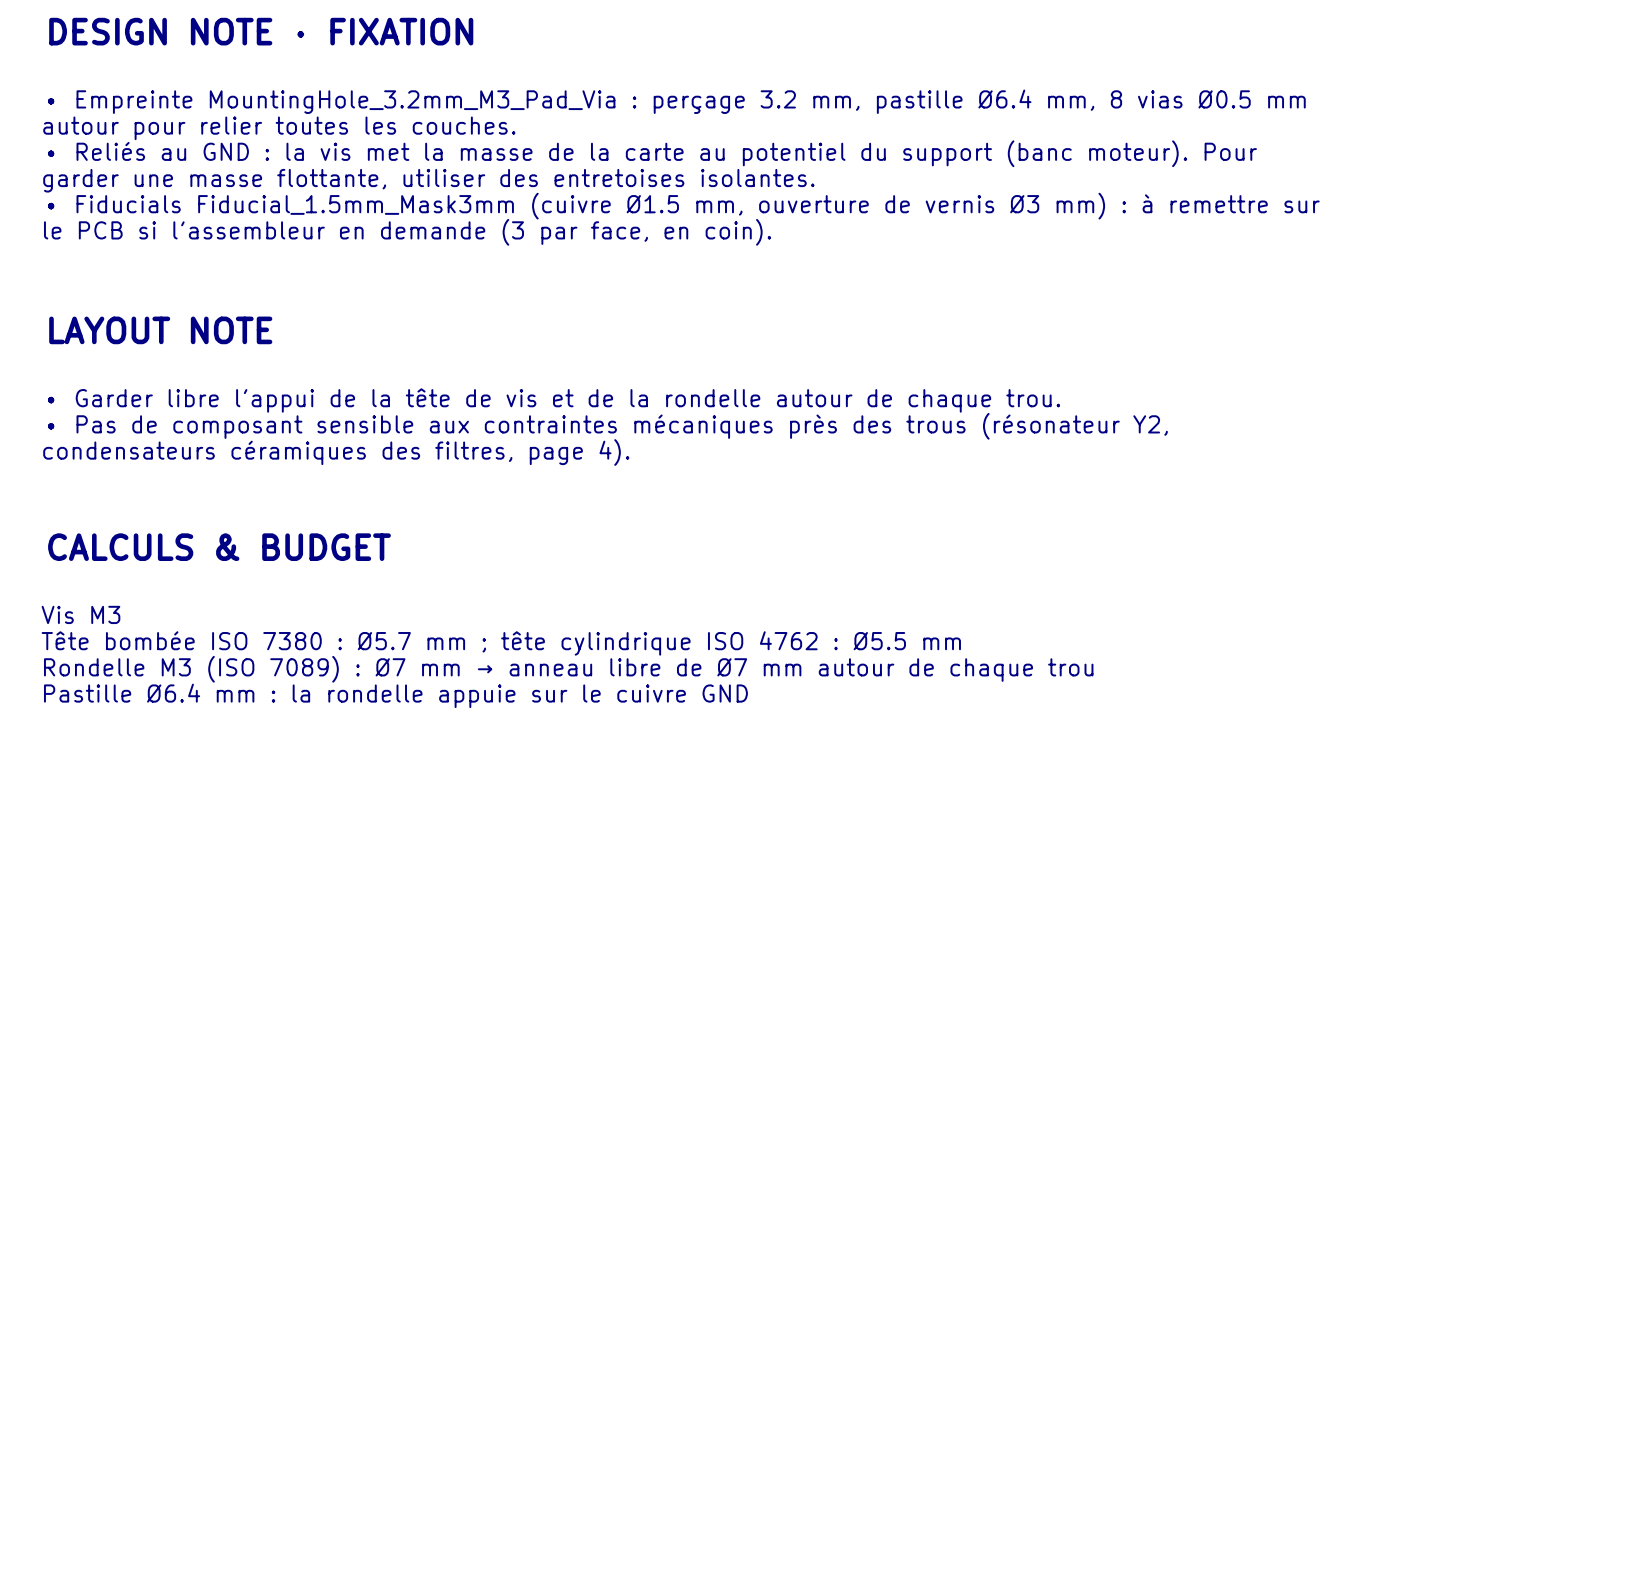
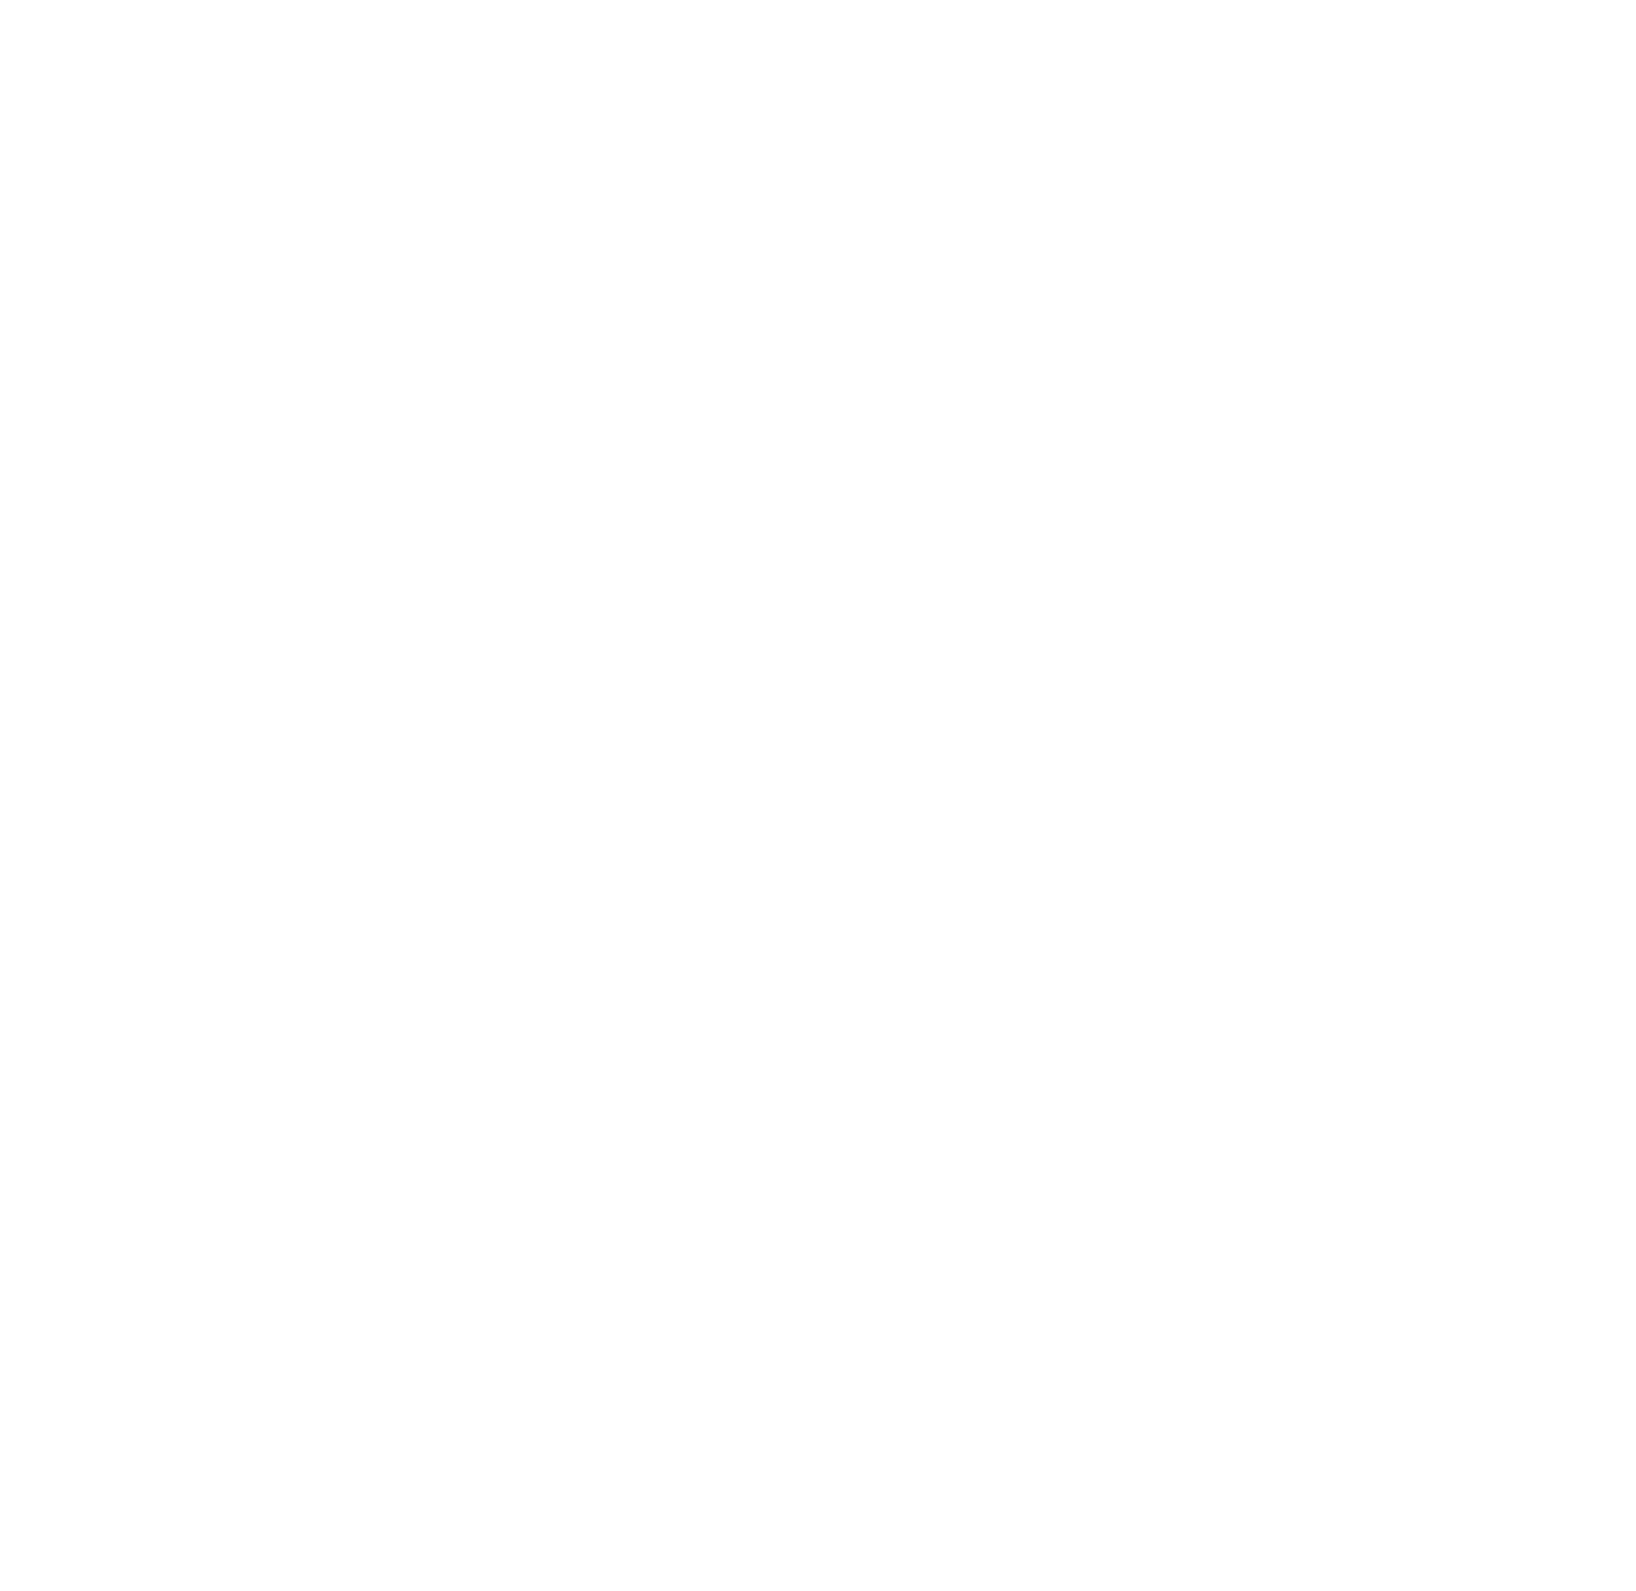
text: DESIGN NOTE · FIXATION (261, 31) -> none
text: • Empreinte MountingHole_3.2mm_M3_Pad_Via : perçage 3.2 mm, pastille Ø6.4 mm, 8 vias Ø0.5 mm (676, 101) -> none
text: autour pour relier toutes les couches. (279, 128) -> none
text: • Reliés au GND : la vis met la masse de la carte au potentiel du support (banc moteur). Pour (652, 153) -> none
text: garder une masse flottante, utiliser des entretoises isolantes. (428, 180) -> none
text: • Fiducials Fiducial_1.5mm_Mask3mm (cuivre Ø1.5 mm, ouverture de vernis Ø3 mm) : à remettre sur (683, 206) -> none
text: le PCB si l'assembleur en demande (3 par face, en coin). (407, 232) -> none
text: LAYOUT NOTE (160, 330) -> none
text: • Garder libre l'appui de la tête de vis et de la rondelle autour de chaque trou. (553, 400) -> none
text: • Pas de composant sensible aux contraintes mécaniques près des trous (résonateur Y2, (607, 426) -> none
text: condensateurs céramiques des filtres, page 4). (336, 452) -> none
text: CALCULS & BUDGET (219, 547) -> none
text: Vis M3 (80, 614) -> none
text: Tête bombée ISO 7380 : Ø5.7 mm ; tête cylindrique ISO 4762 : Ø5.5 mm (501, 643) -> none
text: Rondelle M3 (ISO 7089) : Ø7 mm → anneau libre de Ø7 mm autour de chaque trou (568, 669) -> none
text: Pastille Ø6.4 mm : la rondelle appuie sur le cuivre GND (395, 695) -> none

